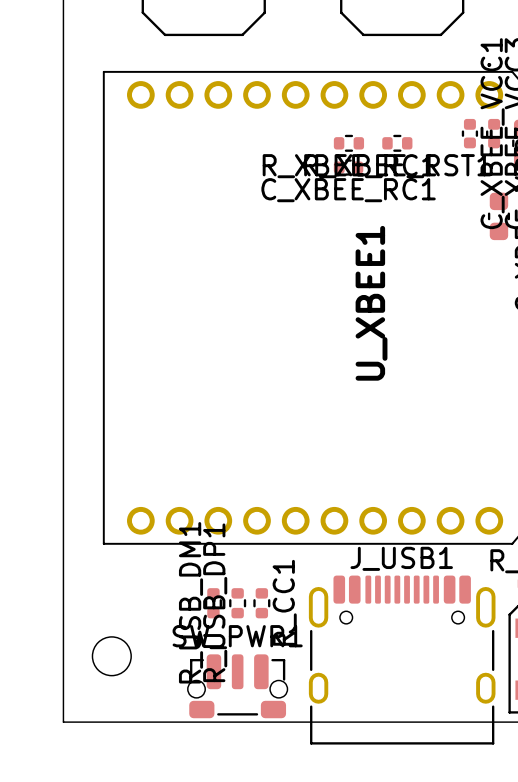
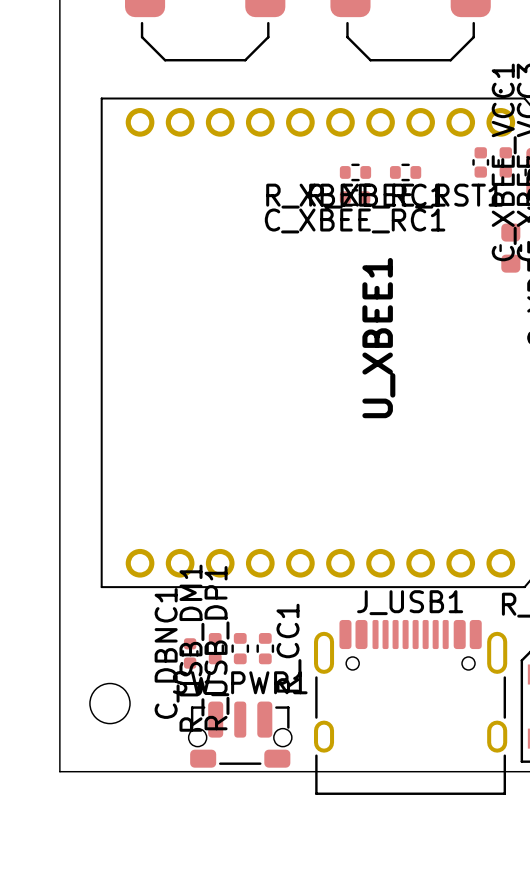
C_DBNC1: none -> (190, 653)

